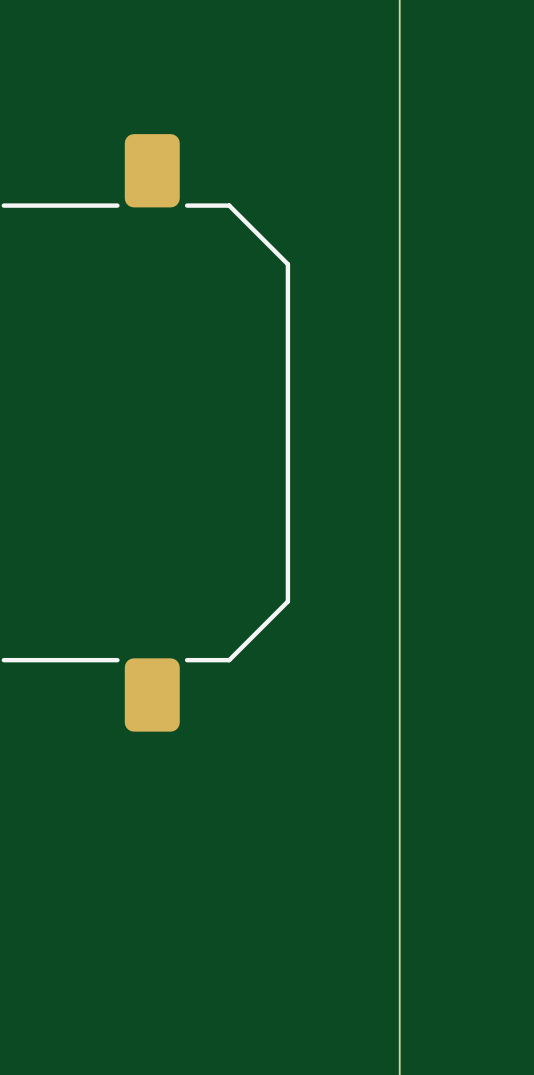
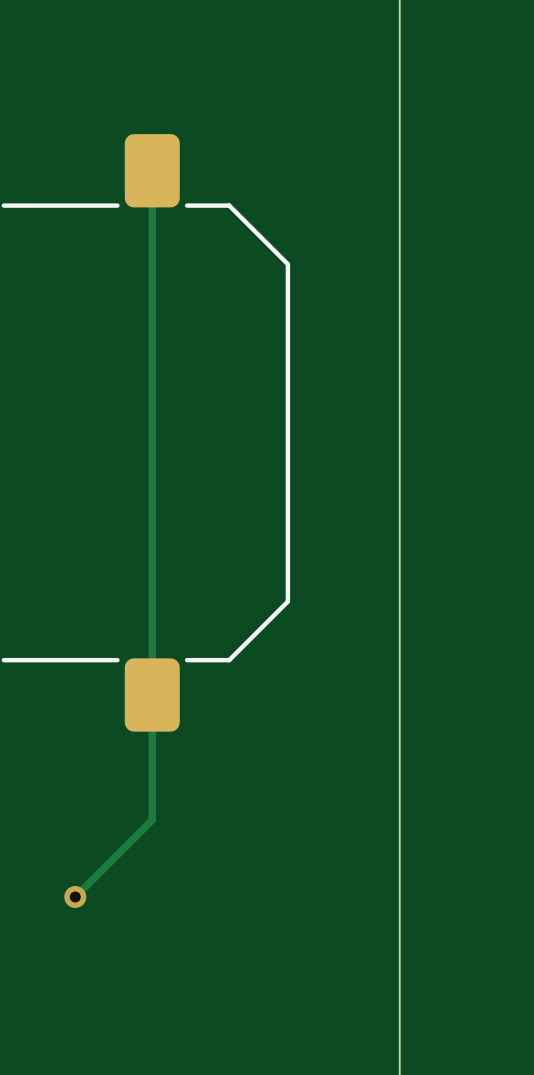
track: none -> (152, 170) (152, 819) (75, 896)
via: none -> (75, 896)

